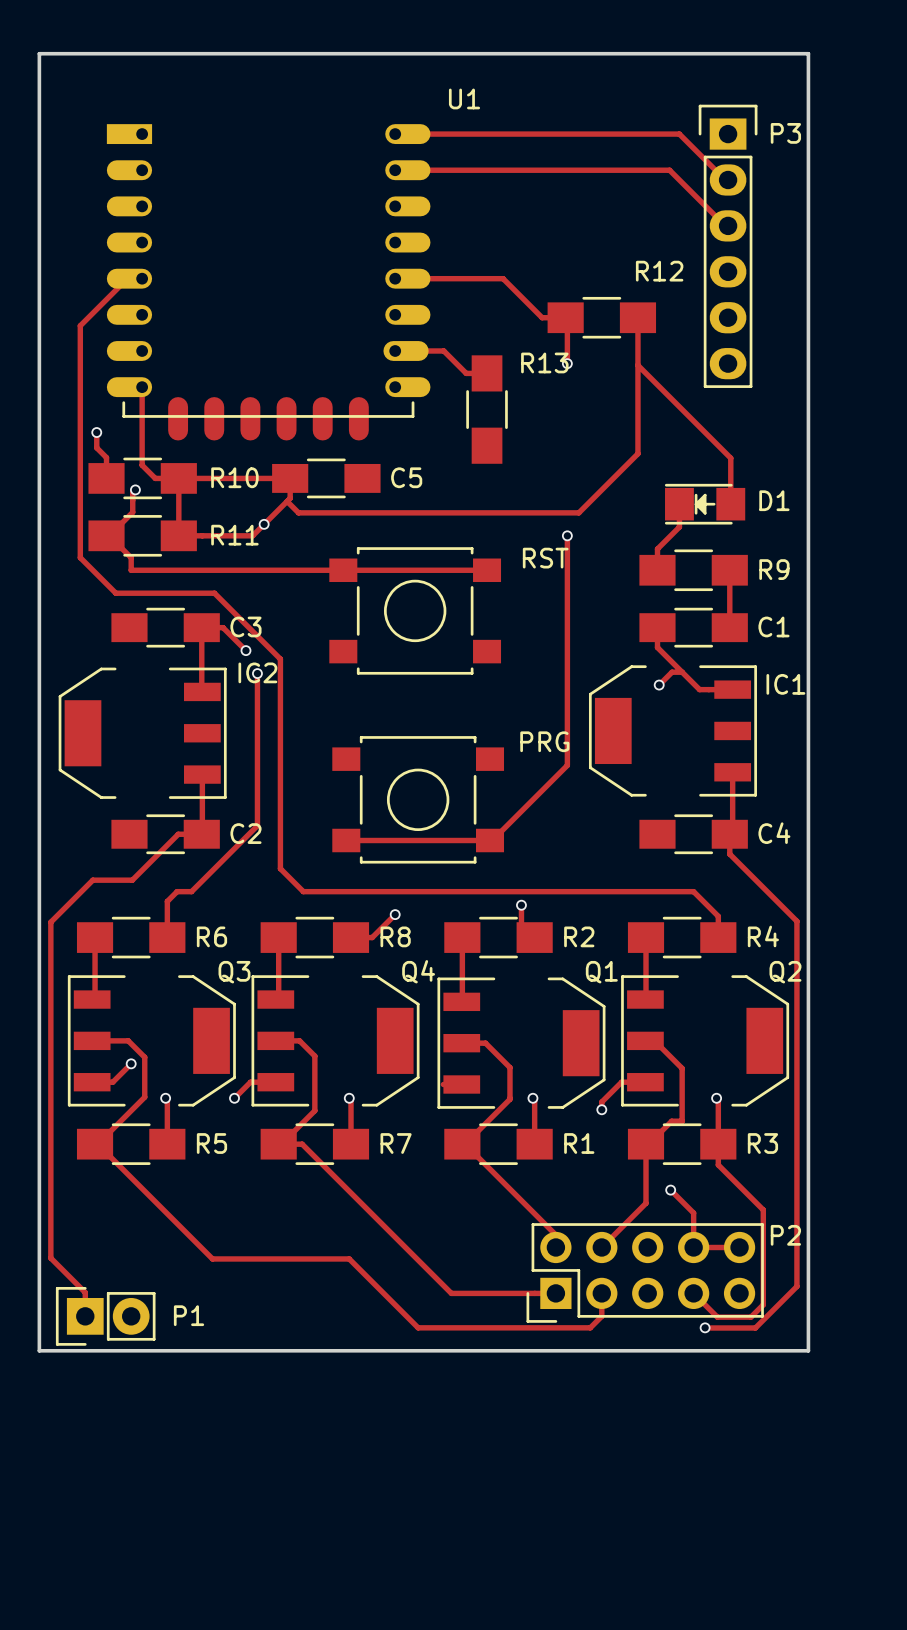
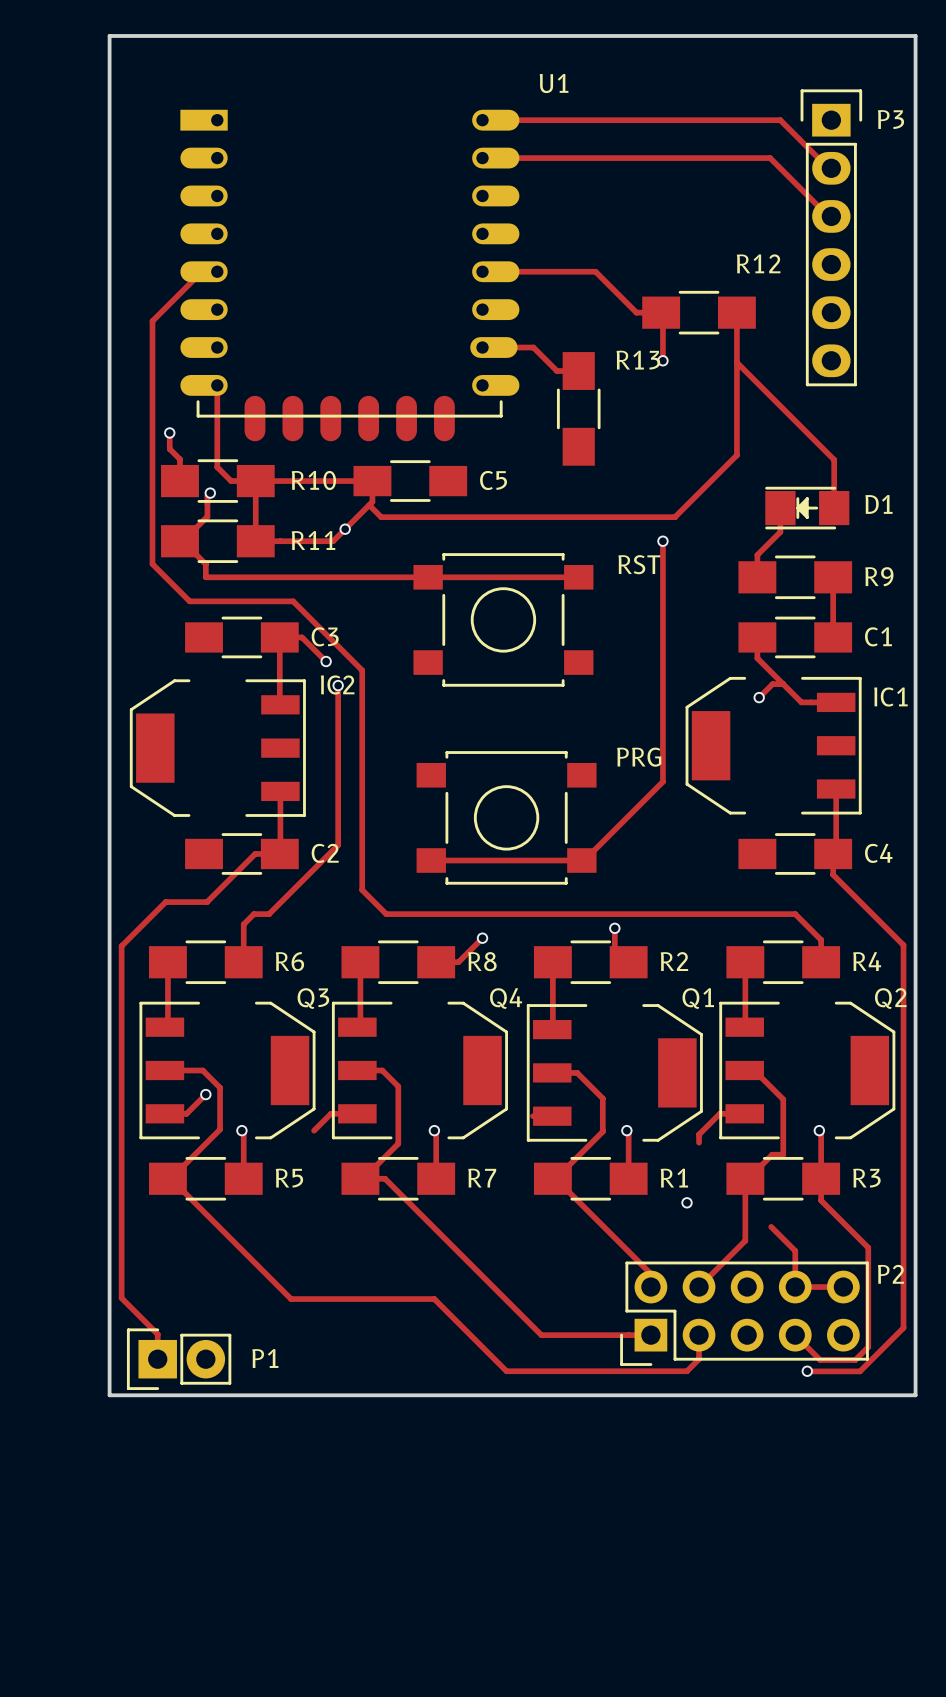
via: (234, 1098) -> none
via: (601, 1109) -> none
via: none -> (687, 1202)
via: (670, 1190) -> none

